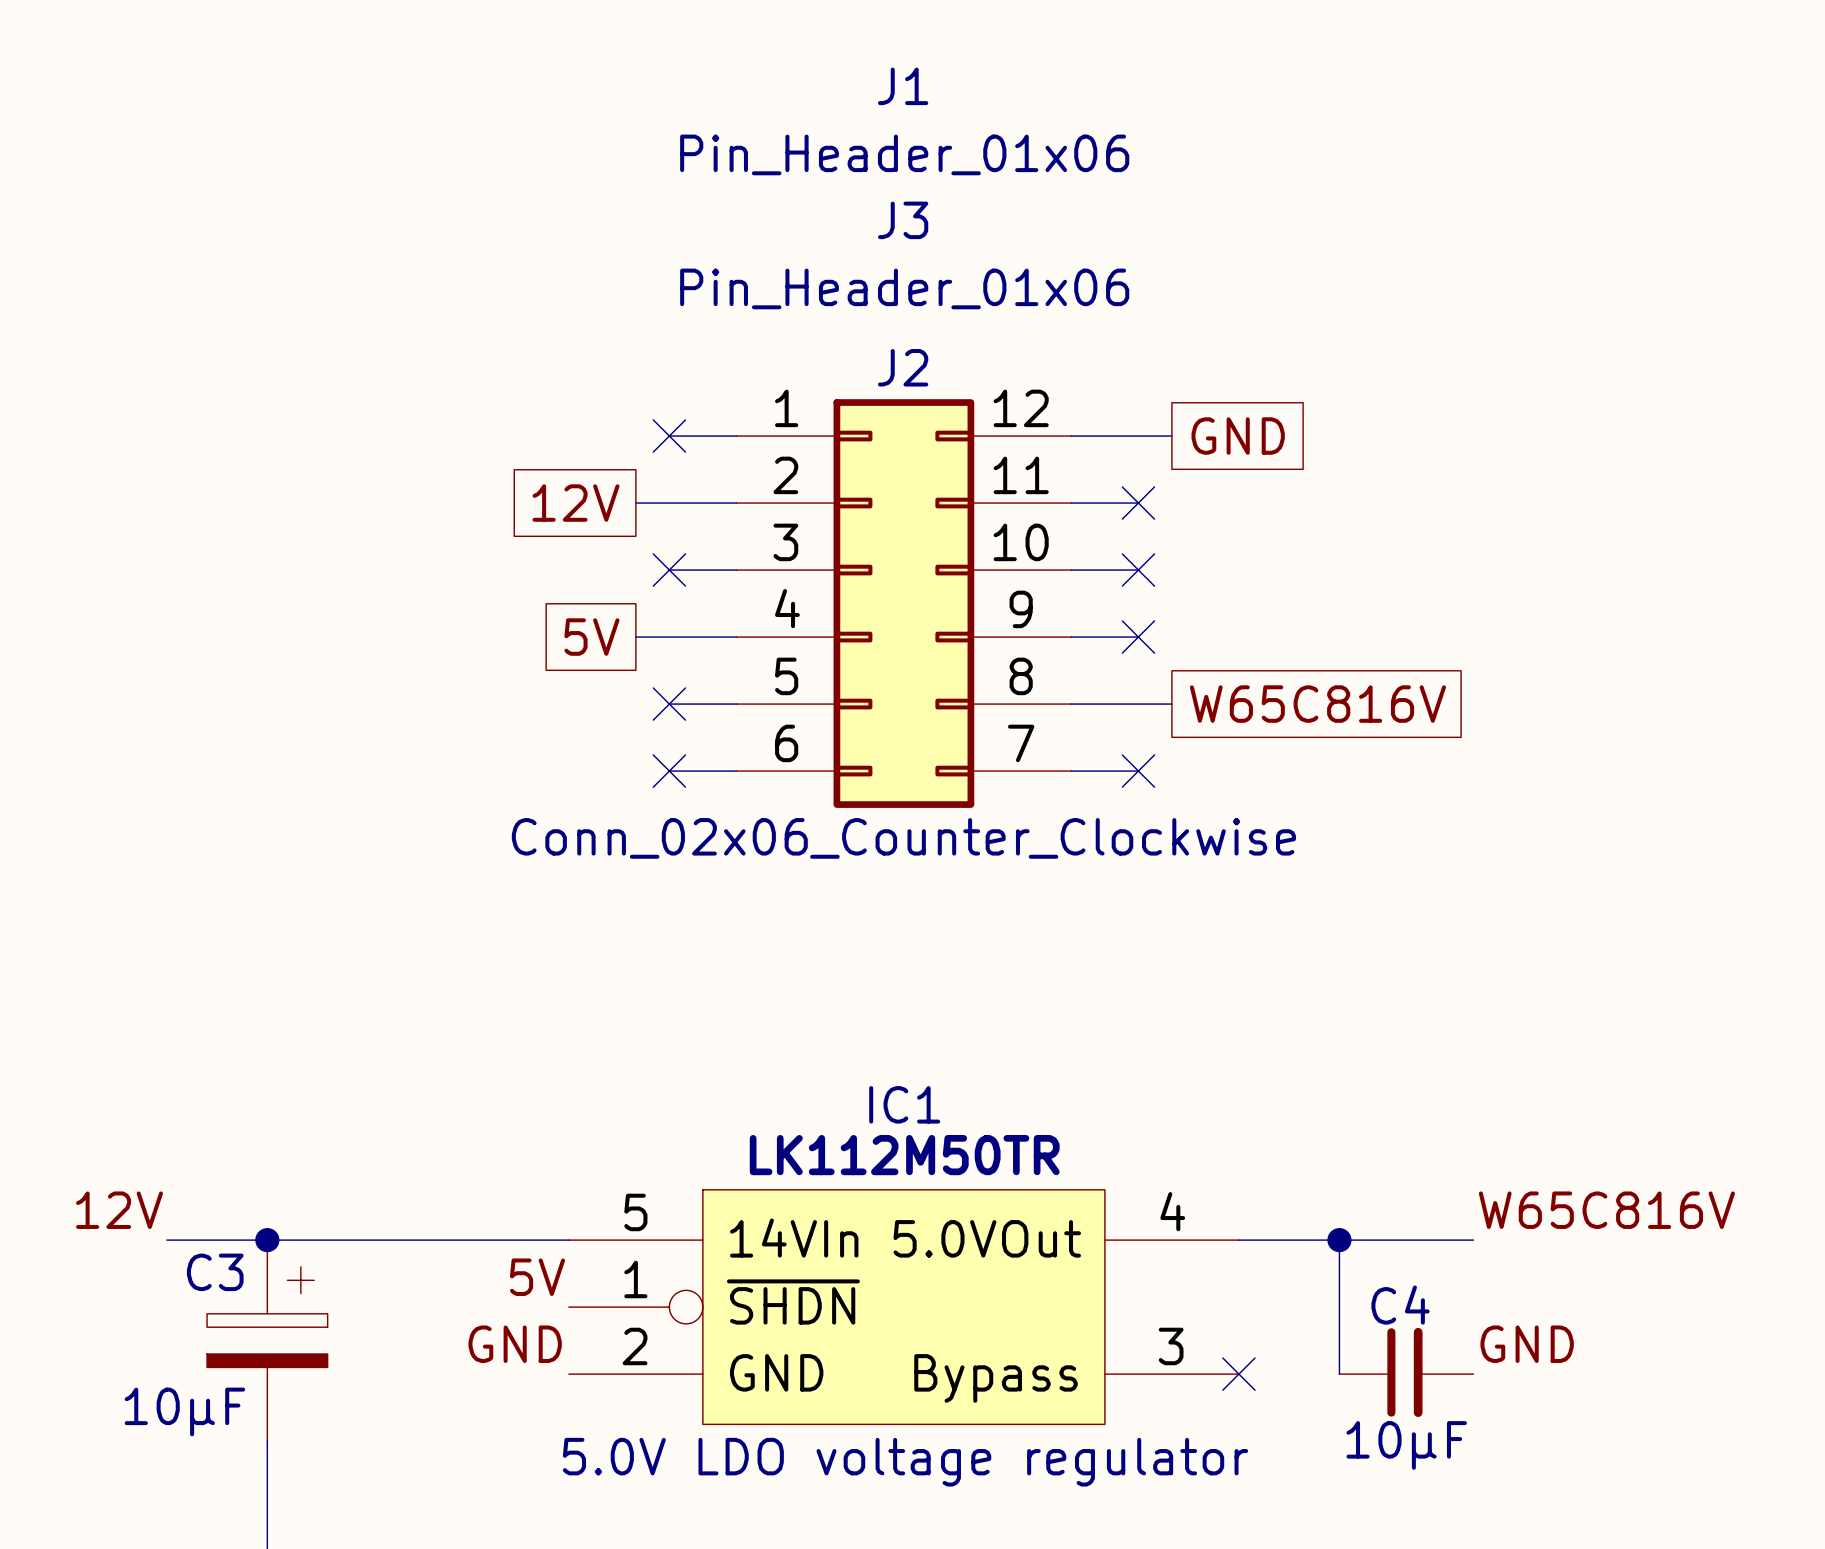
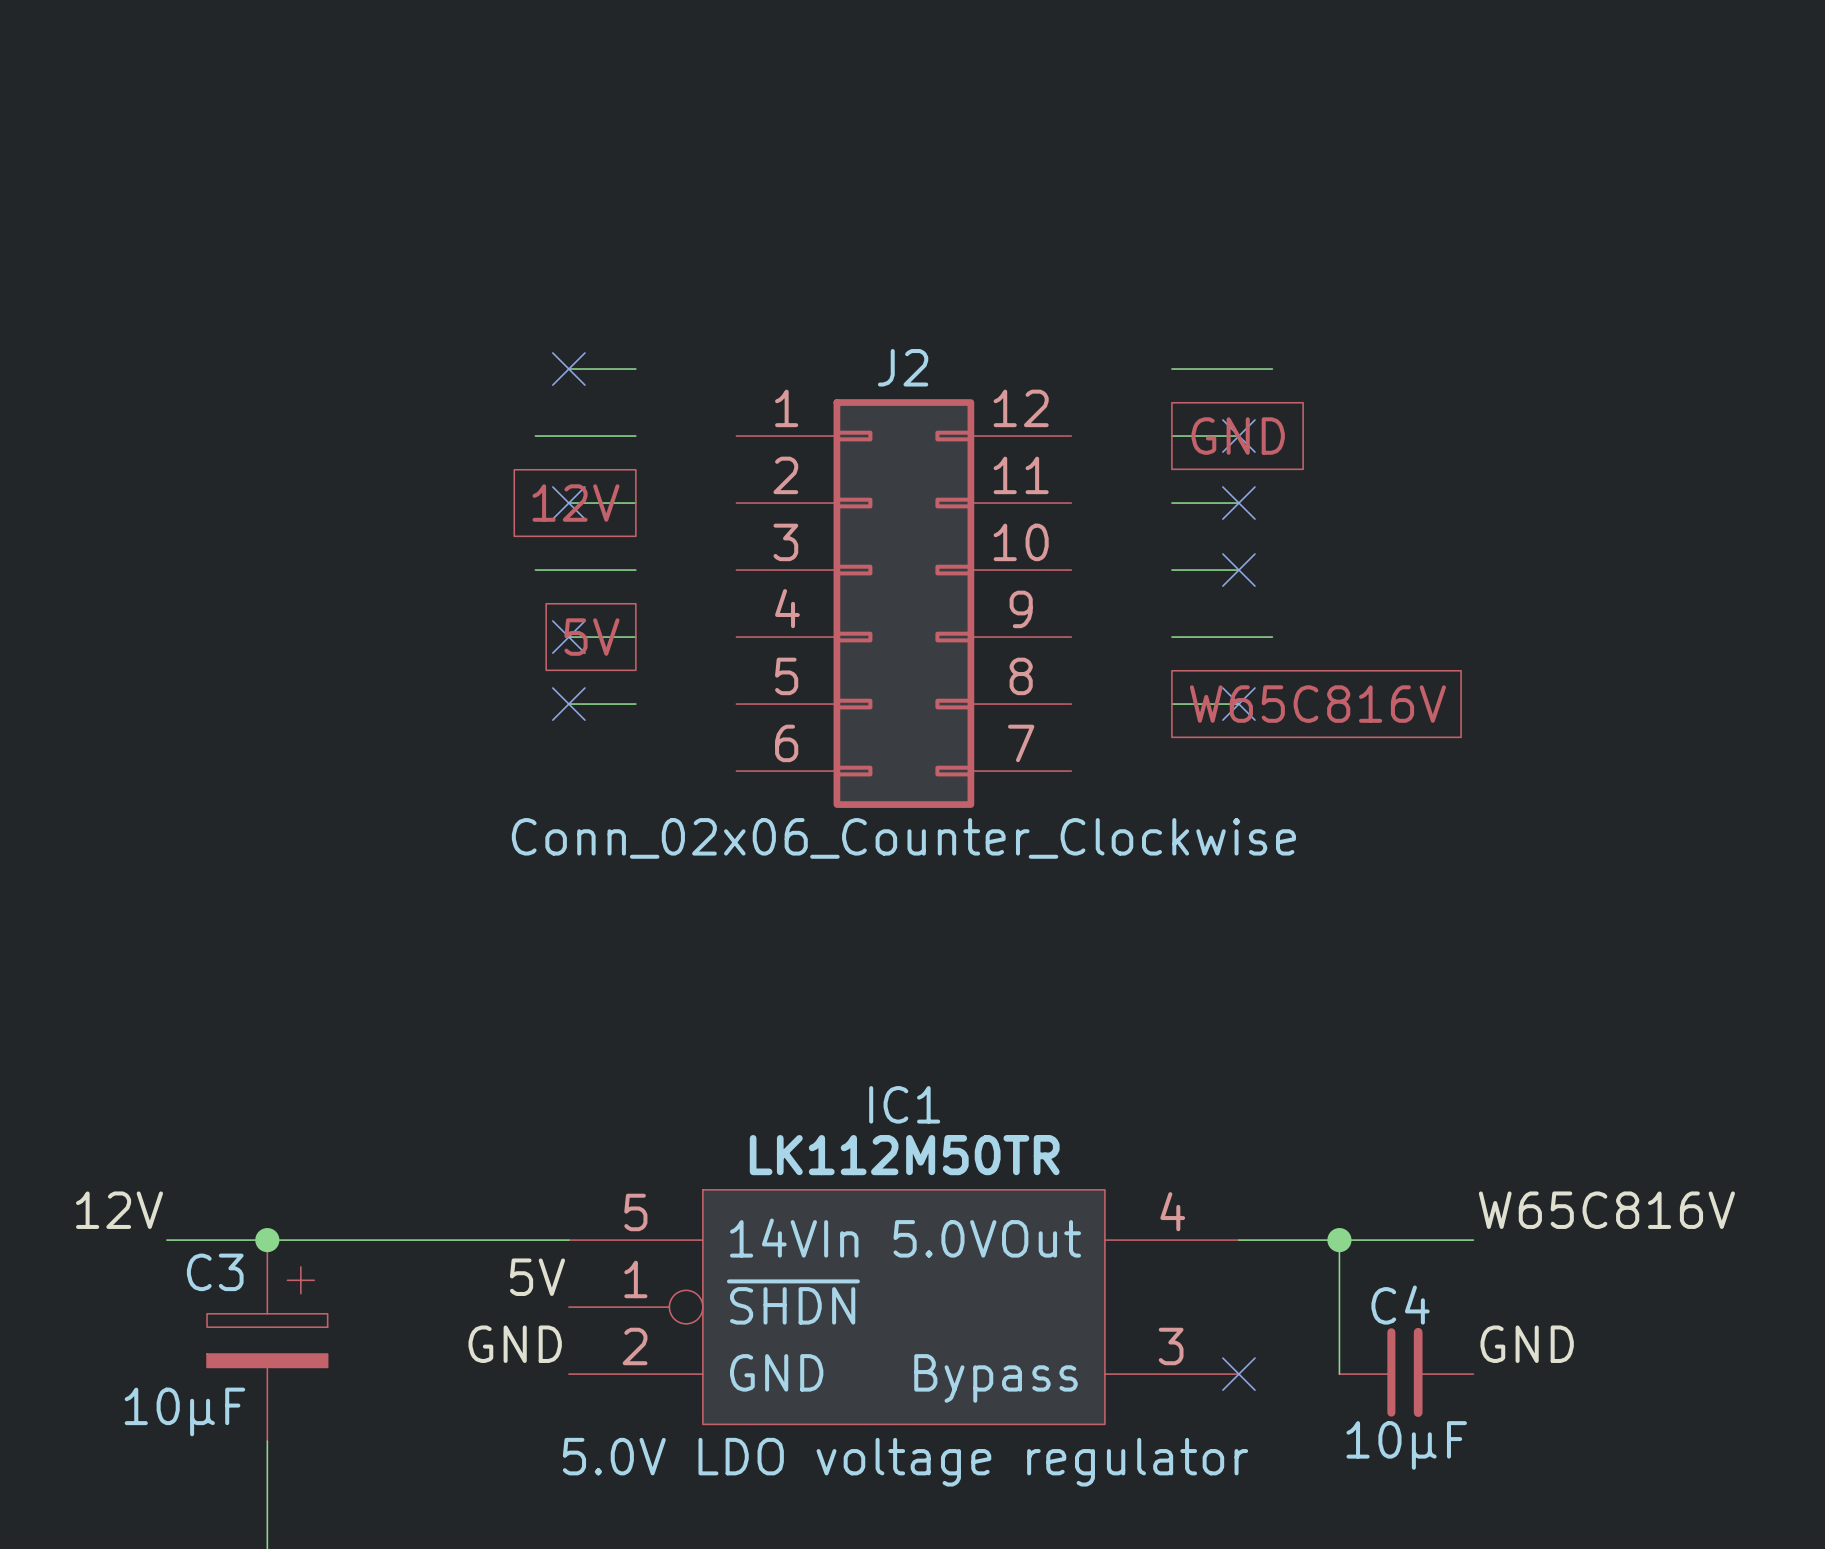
J1: Pin_Header_01x06 (904, 121) -> none
J3: Pin_Header_01x06 (904, 255) -> none
no-connect mark: none -> (568, 369)
wire: none -> (1171, 369) (1272, 369)
wire: none -> (535, 436) (635, 436)
wire: (669, 436) (736, 436) -> (568, 369) (635, 369)
no-connect mark: (669, 436) -> none
wire: (1071, 436) (1171, 436) -> (1238, 436) (1171, 436)
no-connect mark: none -> (1238, 436)
no-connect mark: none -> (568, 503)
wire: (635, 503) (736, 503) -> (635, 503) (568, 503)
wire: (1071, 503) (1138, 503) -> none
no-connect mark: (1138, 503) -> none
no-connect mark: none -> (1238, 503)
wire: none -> (535, 570) (635, 570)
wire: (669, 570) (736, 570) -> none
no-connect mark: (669, 570) -> none
wire: (1071, 570) (1138, 570) -> (1171, 503) (1238, 503)
no-connect mark: (1138, 570) -> none
no-connect mark: none -> (1238, 570)
no-connect mark: none -> (568, 637)
wire: (635, 637) (736, 637) -> (635, 637) (568, 637)
wire: (1071, 637) (1138, 637) -> (1171, 570) (1238, 570)
no-connect mark: (1138, 637) -> none
wire: none -> (1171, 637) (1272, 637)
no-connect mark: none -> (568, 704)
wire: (669, 704) (736, 704) -> none
no-connect mark: (669, 704) -> none
wire: (1071, 704) (1171, 704) -> (1238, 704) (1171, 704)
no-connect mark: none -> (1238, 704)
wire: (669, 771) (736, 771) -> (568, 704) (635, 704)
no-connect mark: (669, 771) -> none
wire: (1071, 771) (1138, 771) -> none
no-connect mark: (1138, 771) -> none

